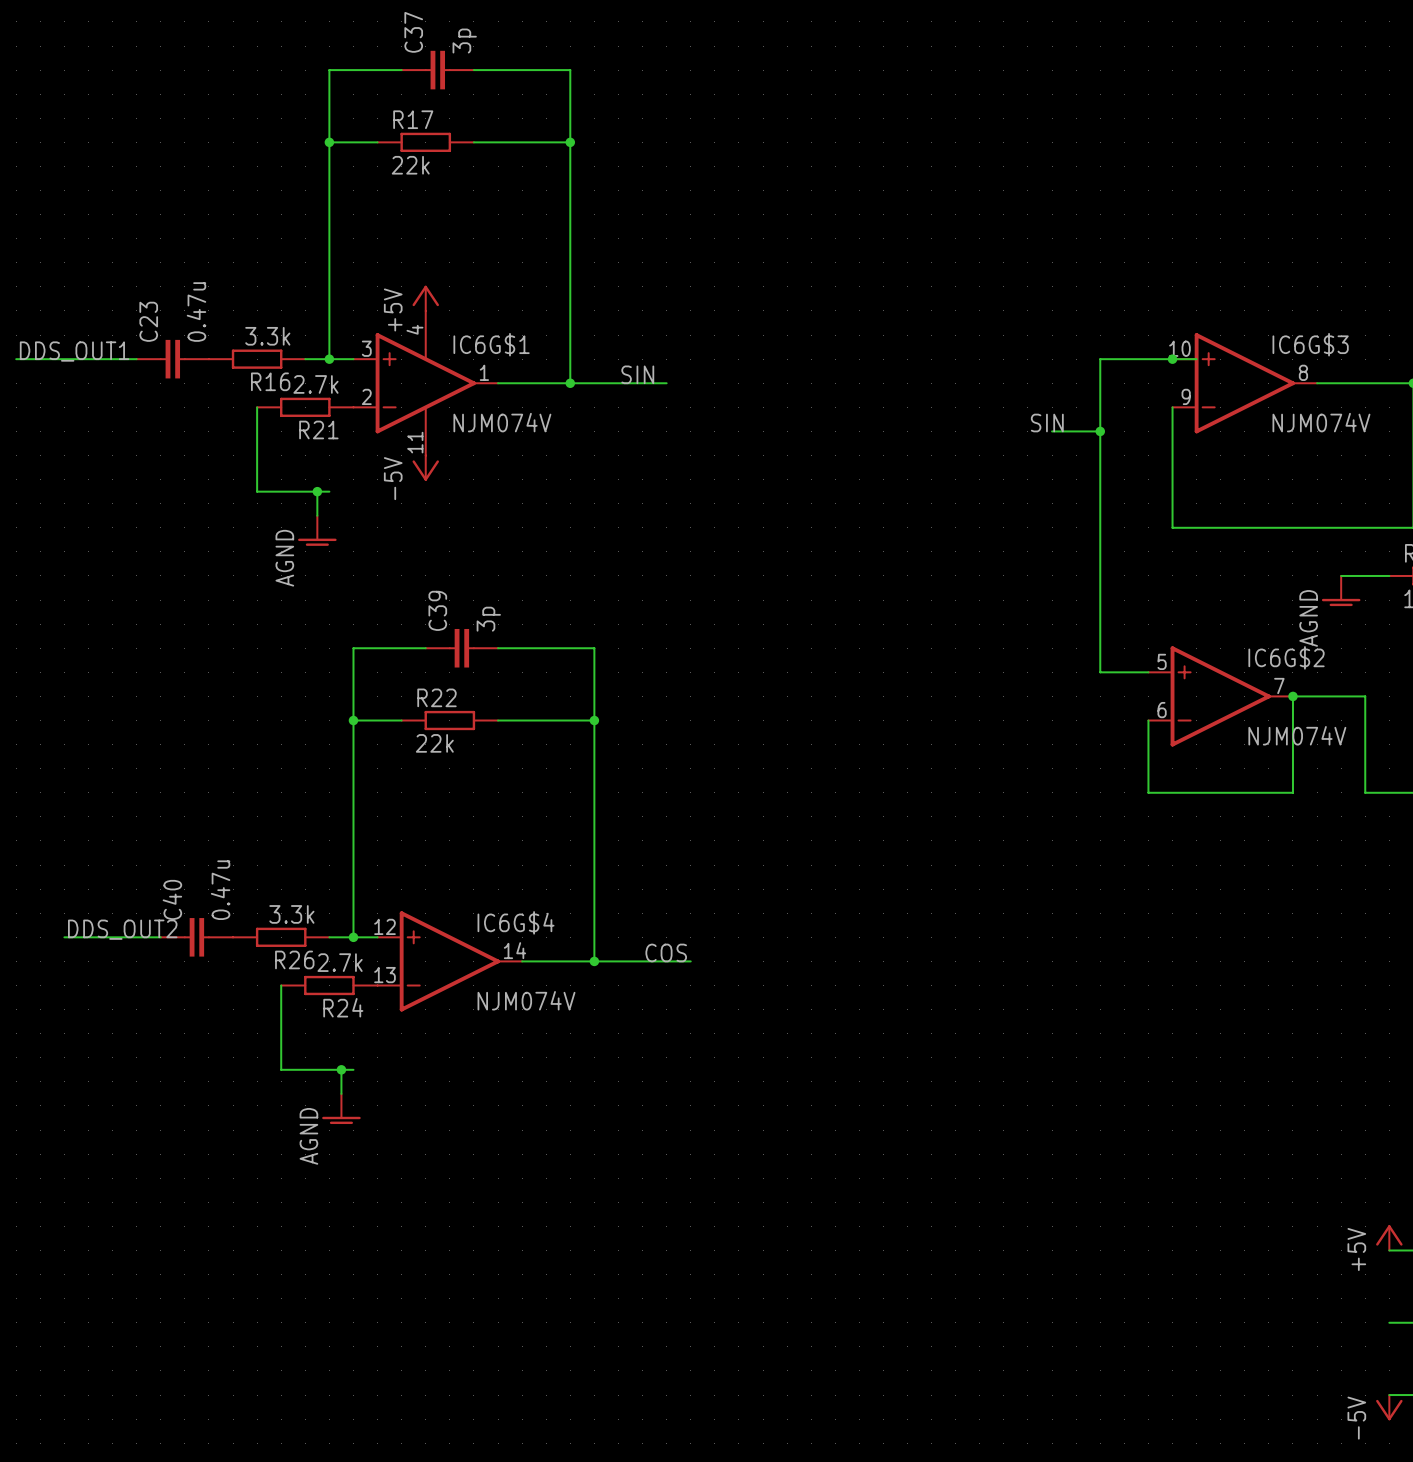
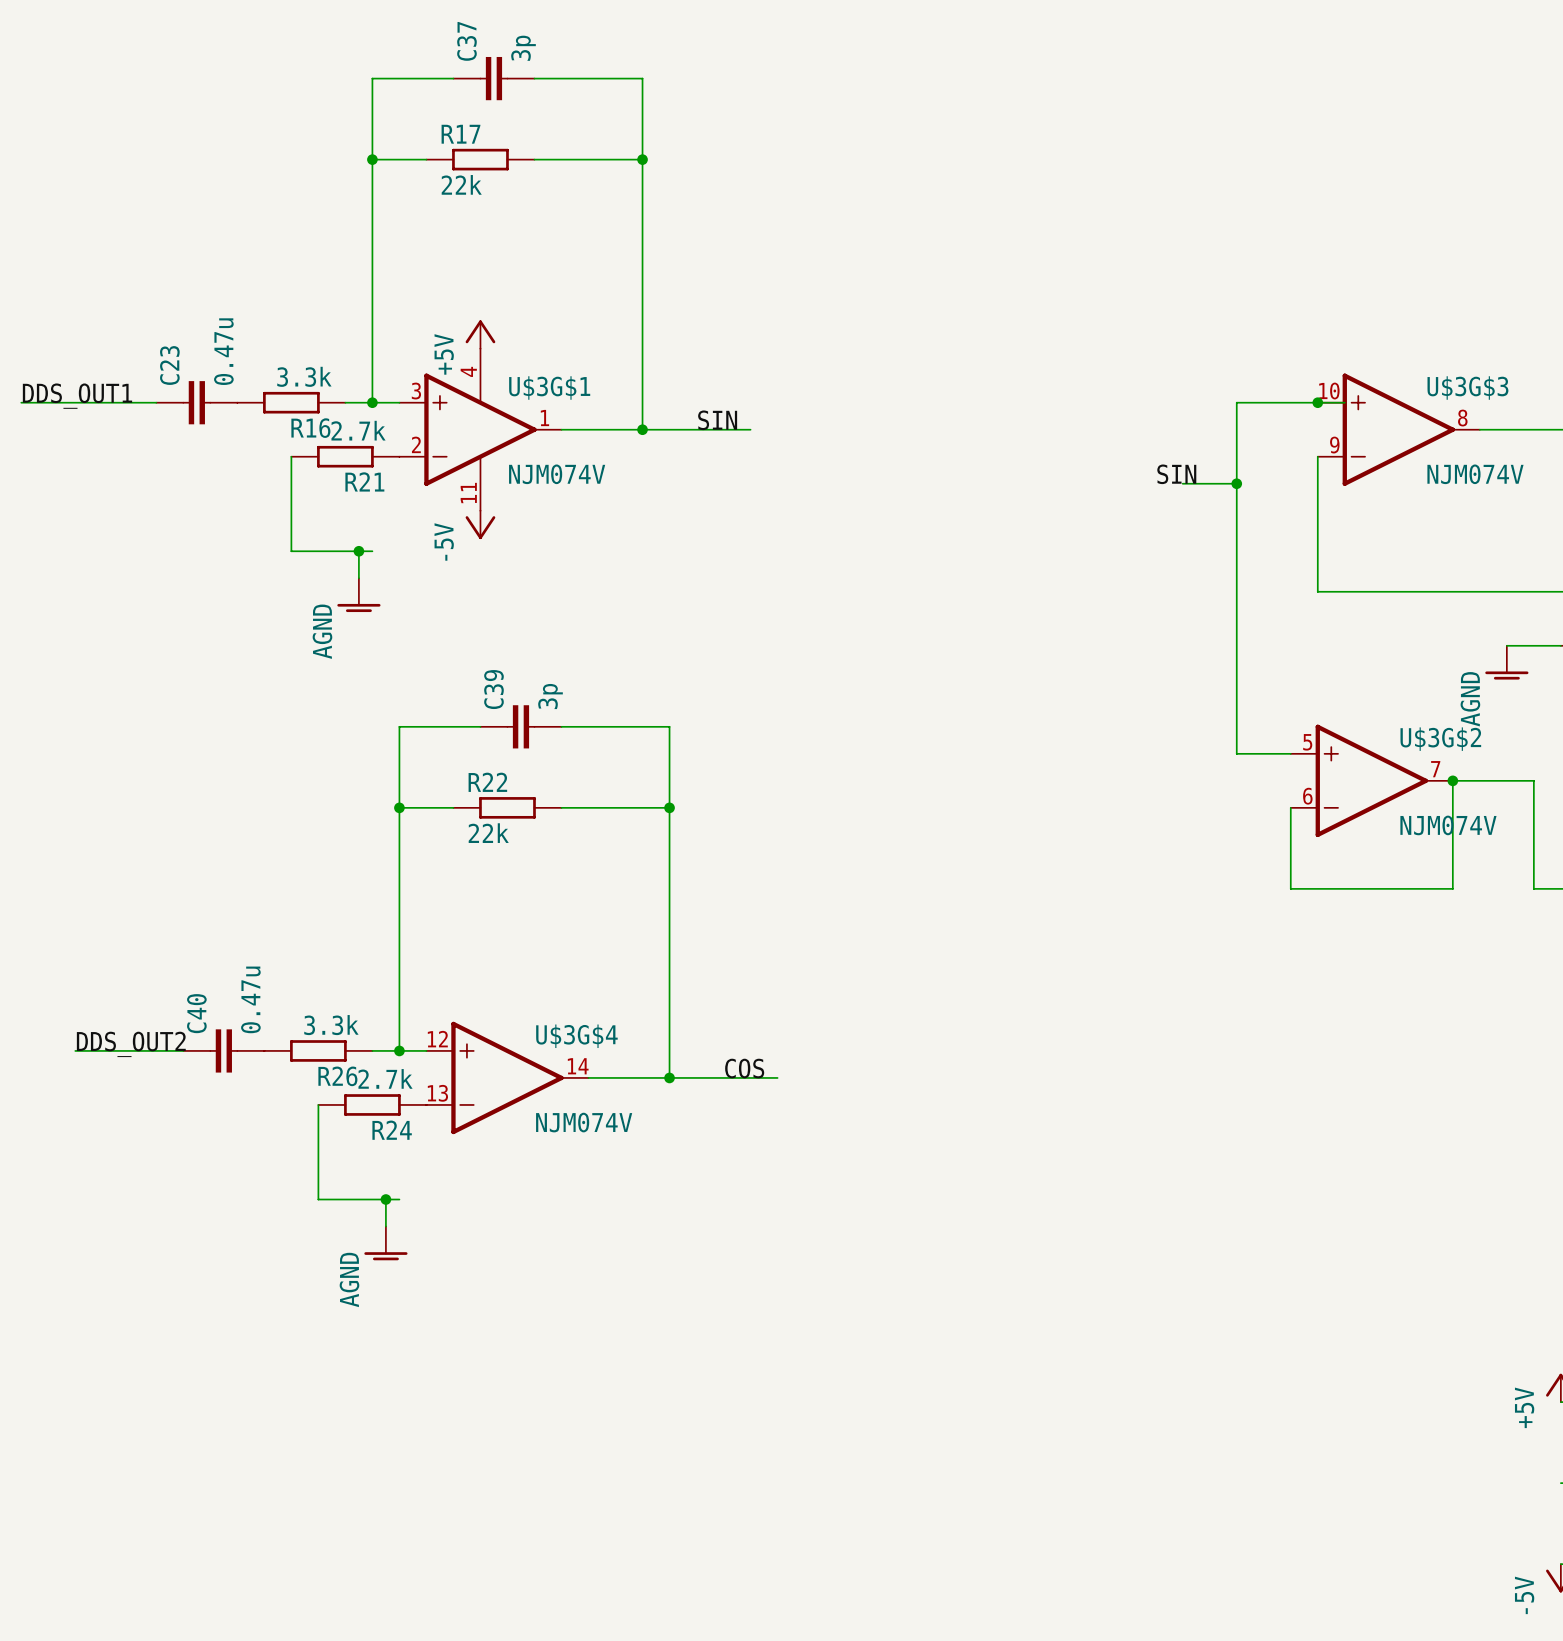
IC6G$1 name: IC6G$1 (491, 344) -> U$3G$1 (549, 388)
IC6G$3 name: IC6G$3 (1310, 344) -> U$3G$3 (1467, 388)
IC6G$2 name: IC6G$2 (1286, 657) -> U$3G$2 (1440, 739)
IC6G$4 name: IC6G$4 (516, 922) -> U$3G$4 (576, 1036)

